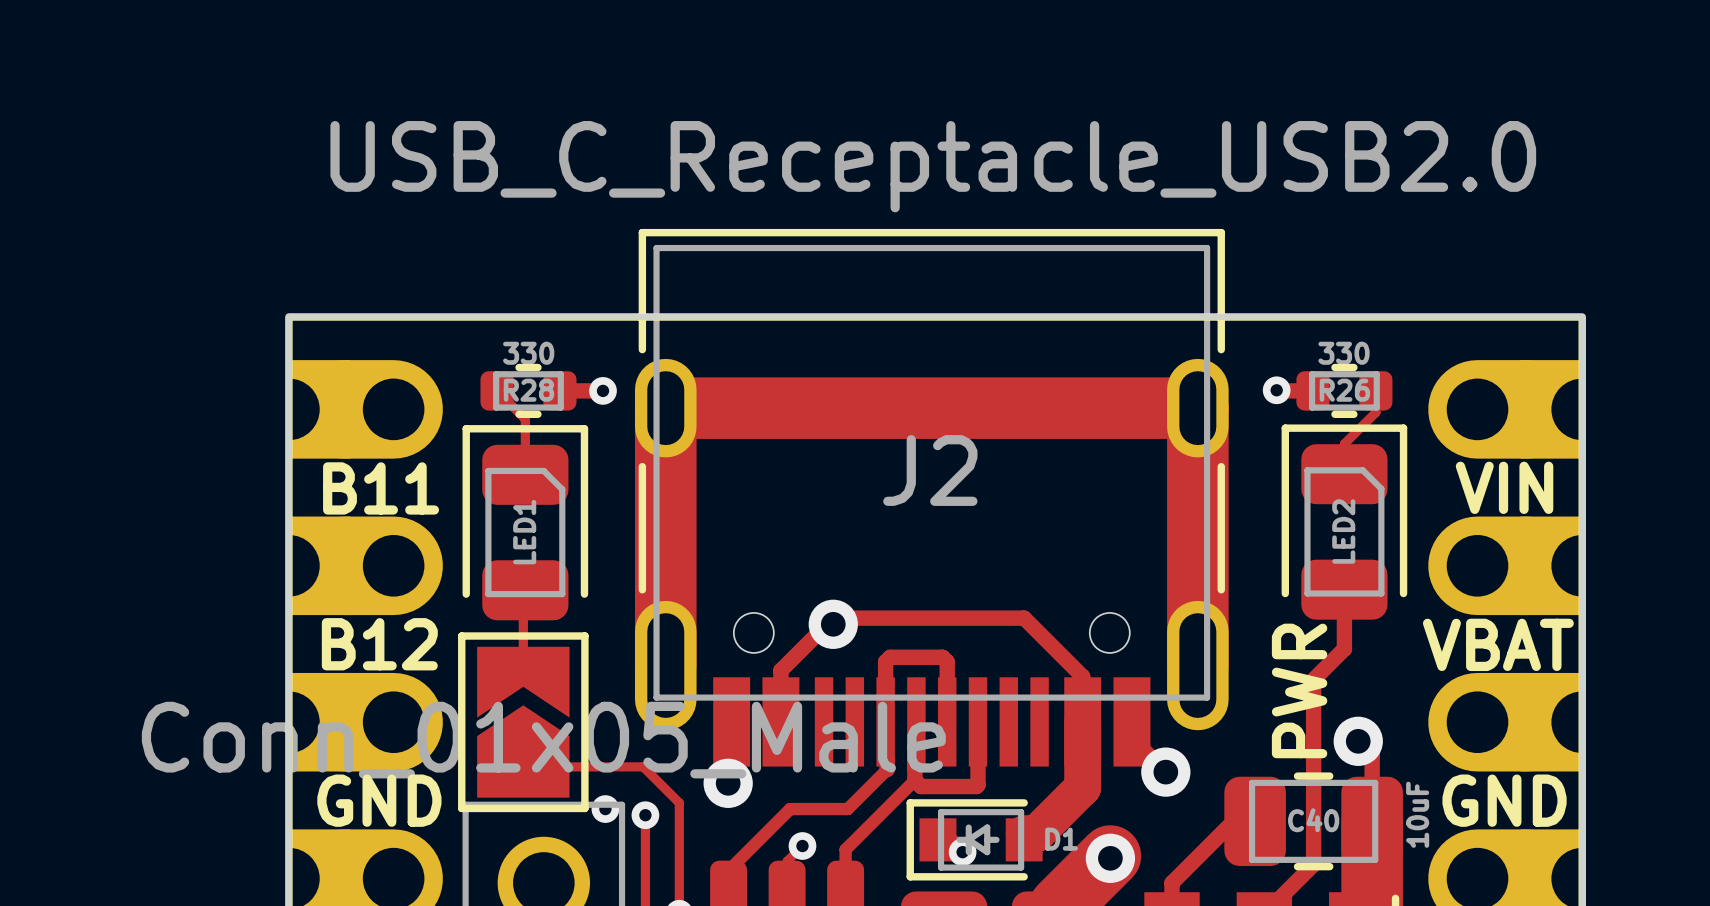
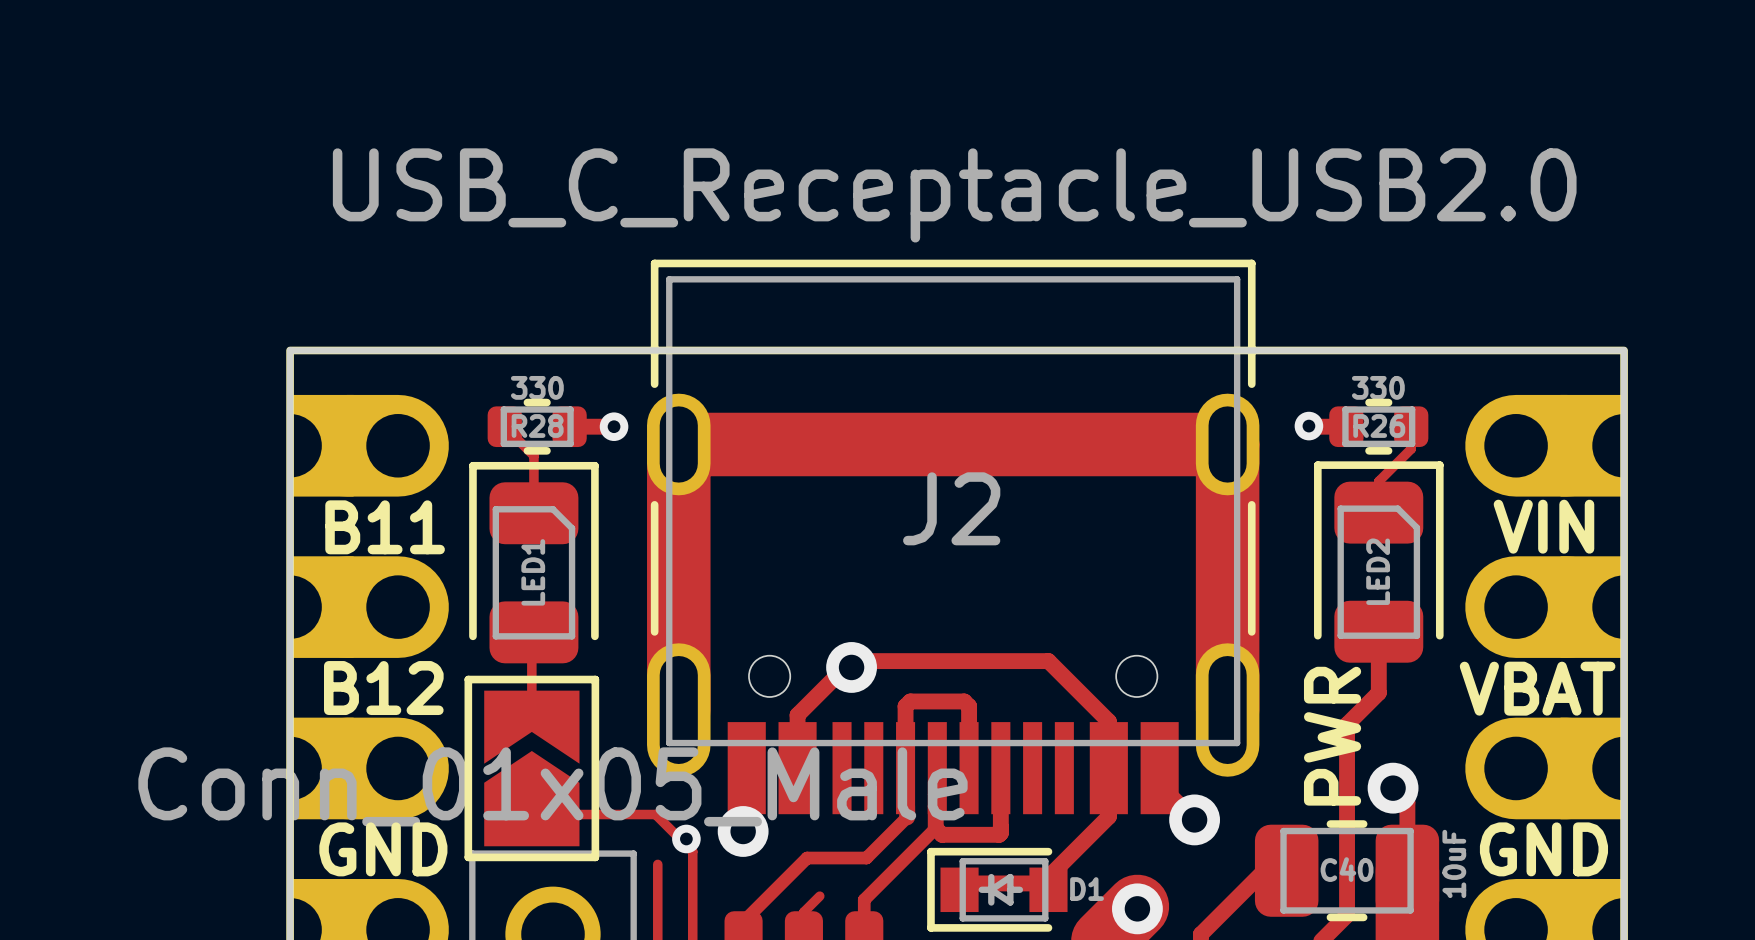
track: (1082, 769) (1082, 787) (1036, 833) (1024, 833) -> (1108, 816) (1042, 883) (965, 883)
via: none -> (686, 838)
via: (605, 809) -> none
via: (645, 815) -> none
via: (802, 846) -> none
via: (962, 852) -> none

